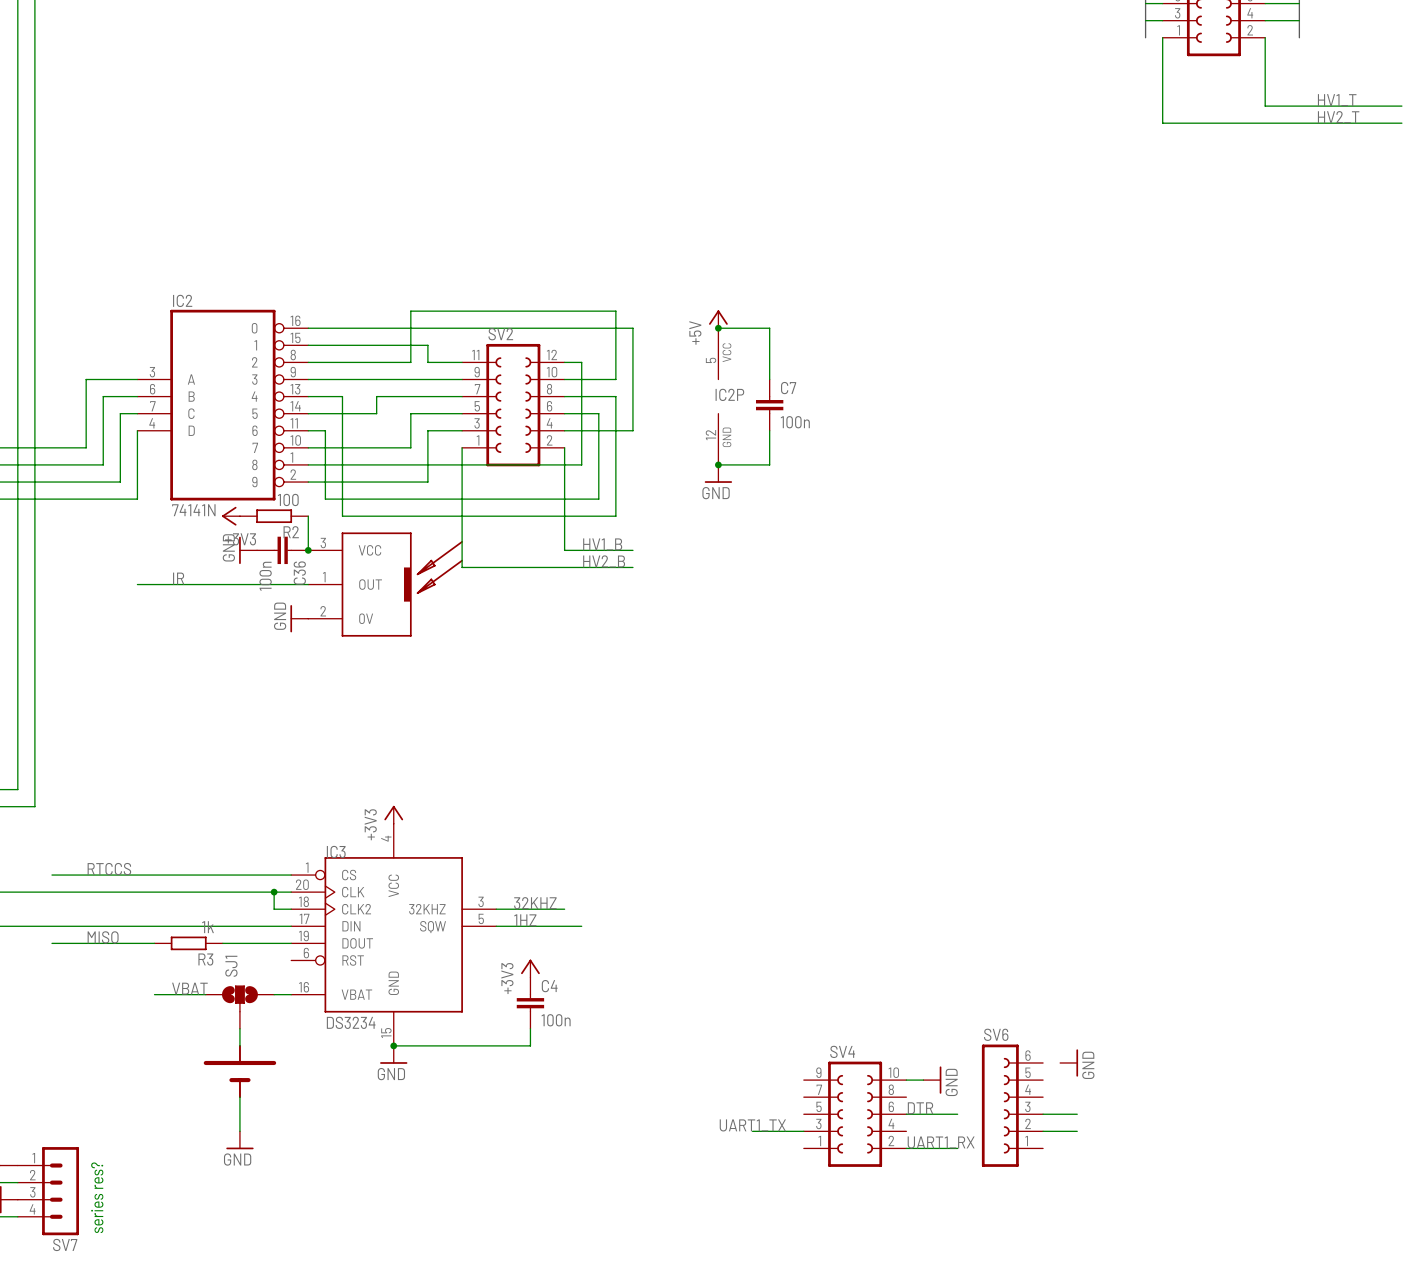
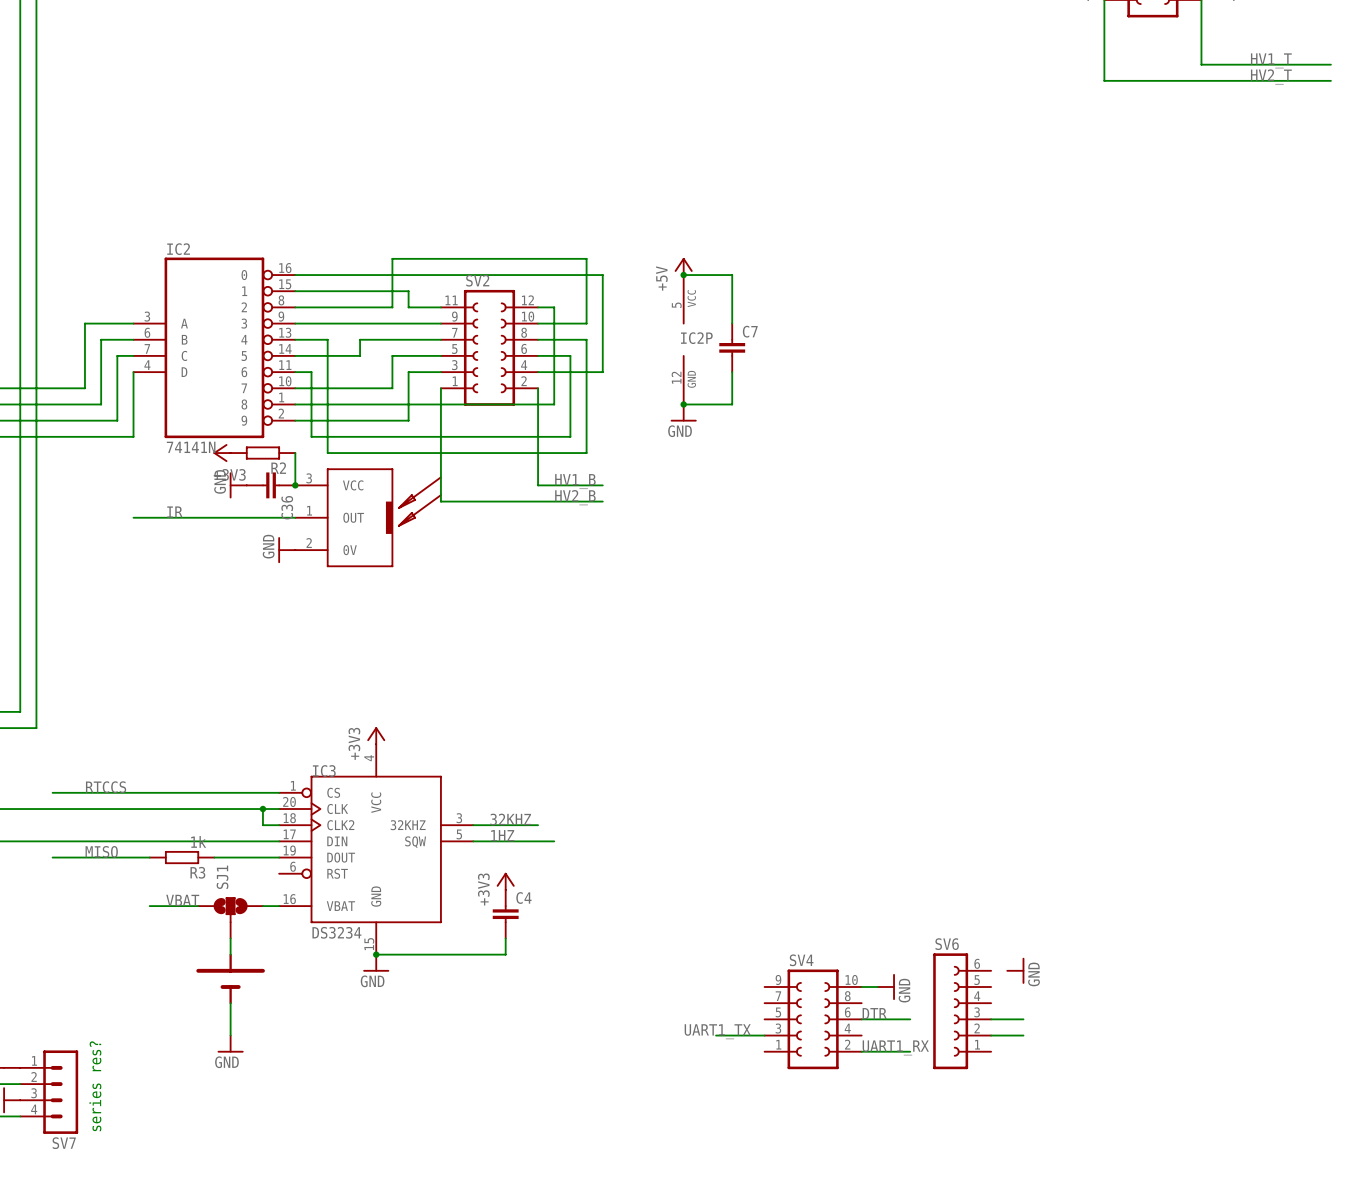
C7 value: 100n (795, 422) -> none
R2 value: 100 (288, 499) -> none
C36 value: 100n (265, 576) -> none
C4 value: 100n (556, 1020) -> none

